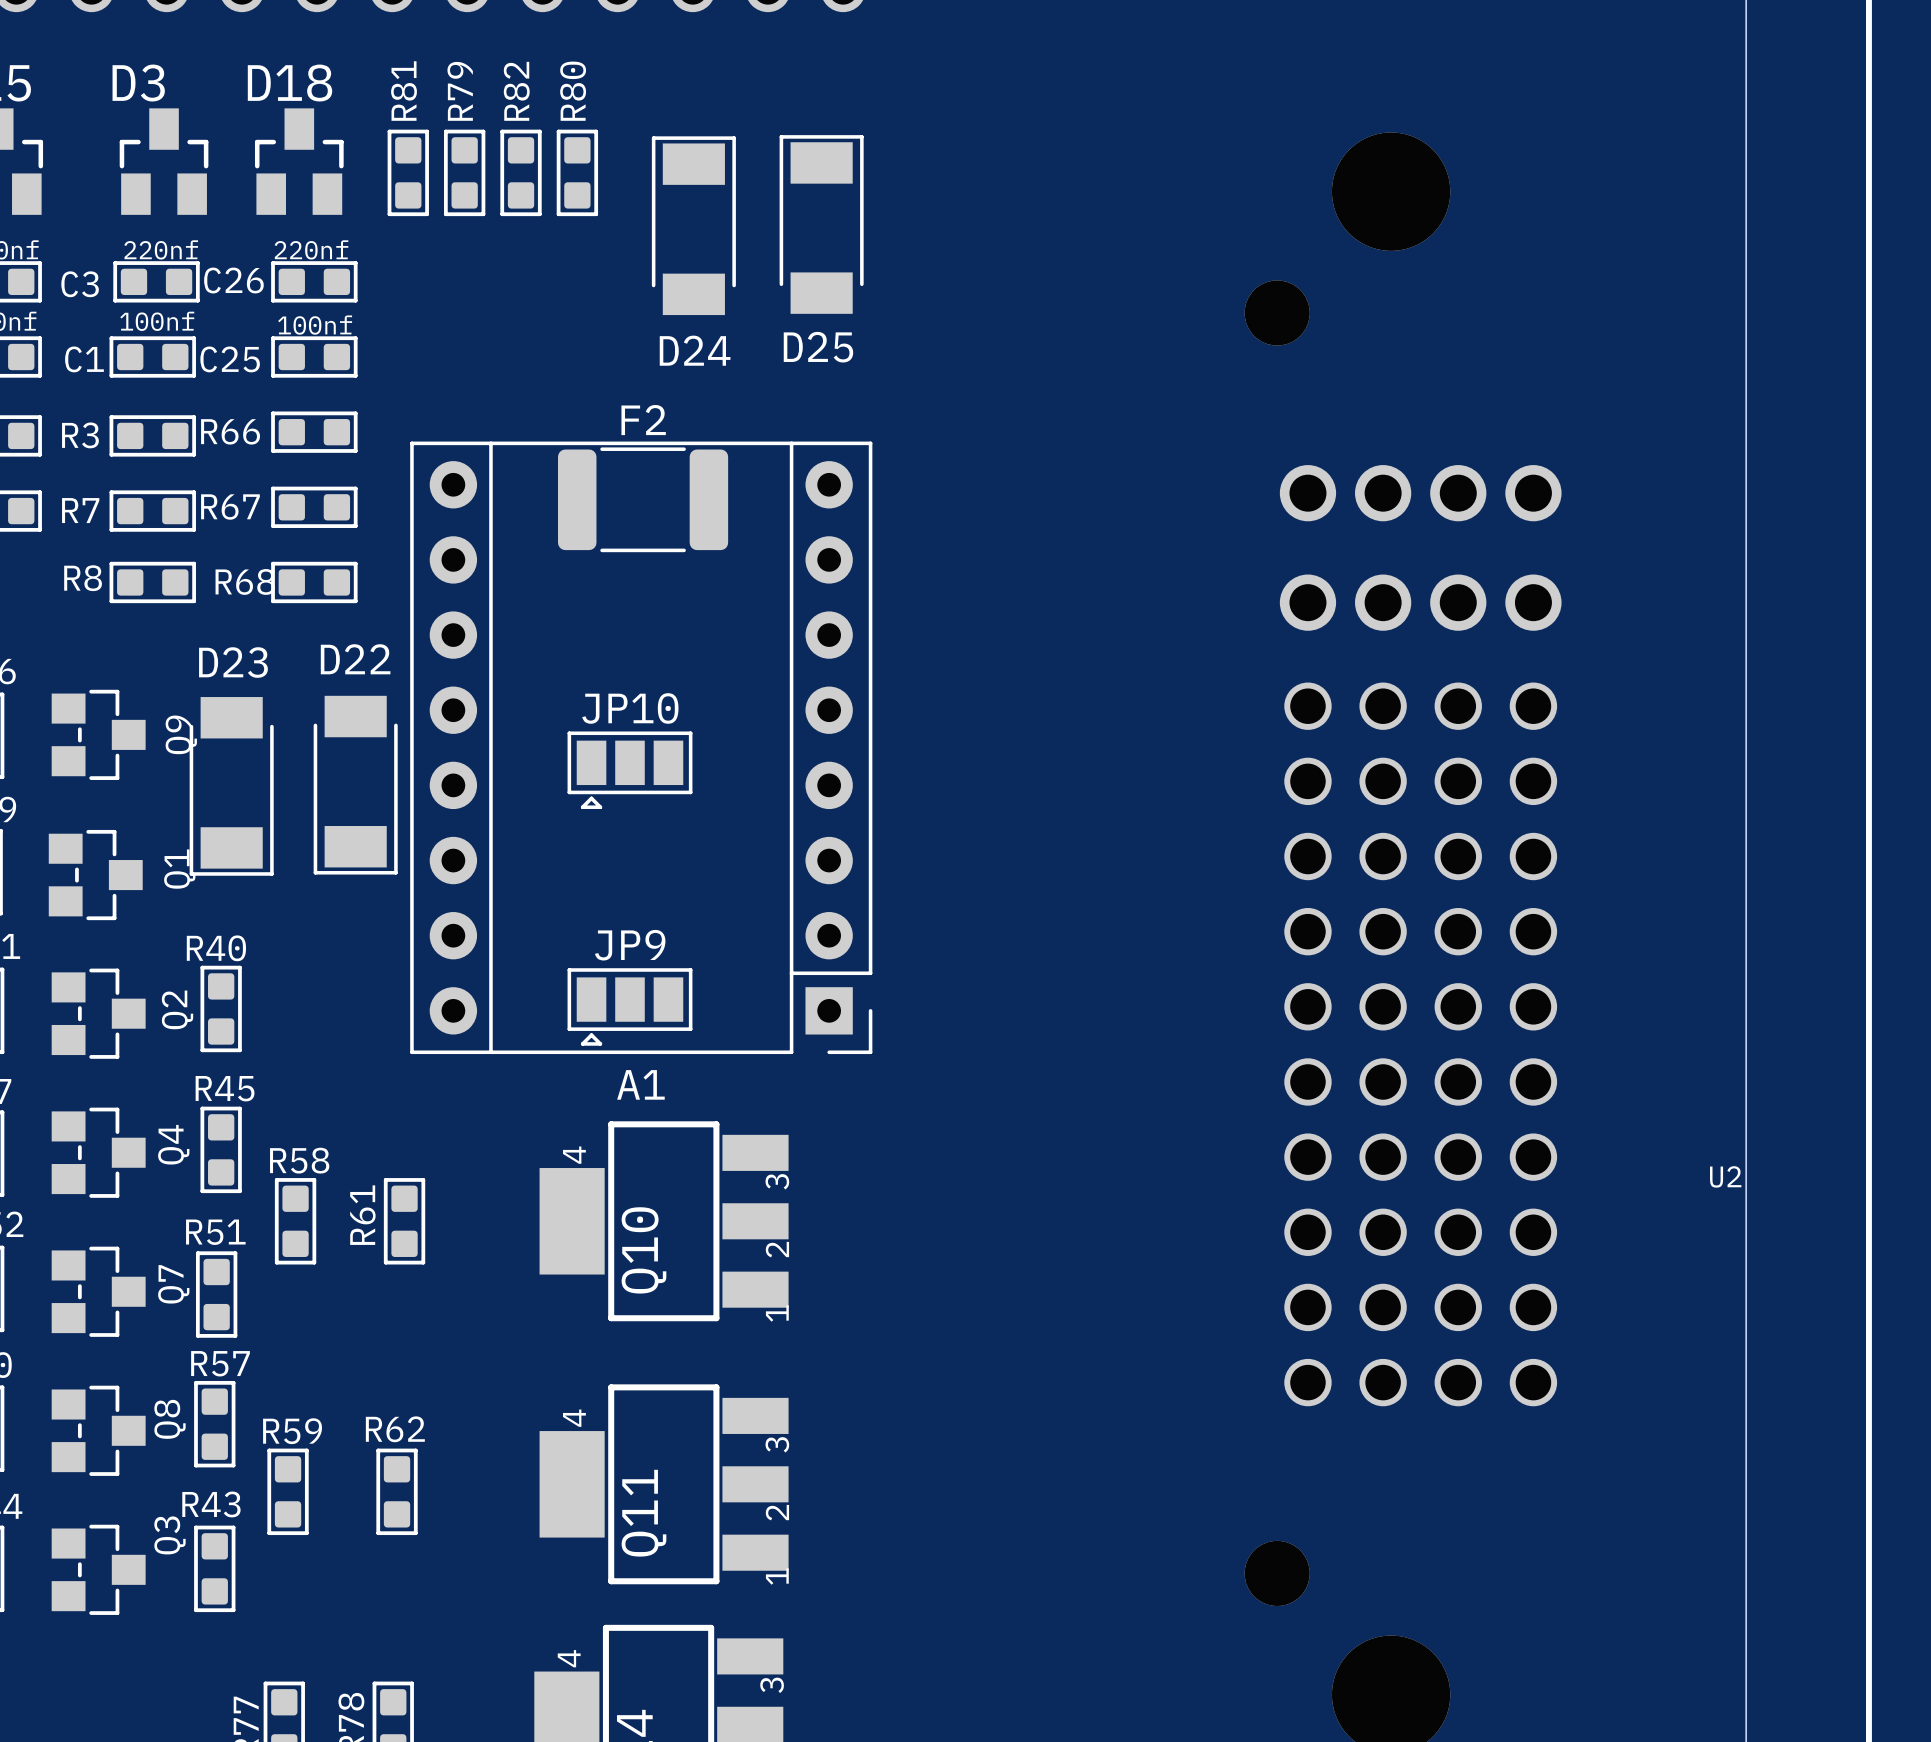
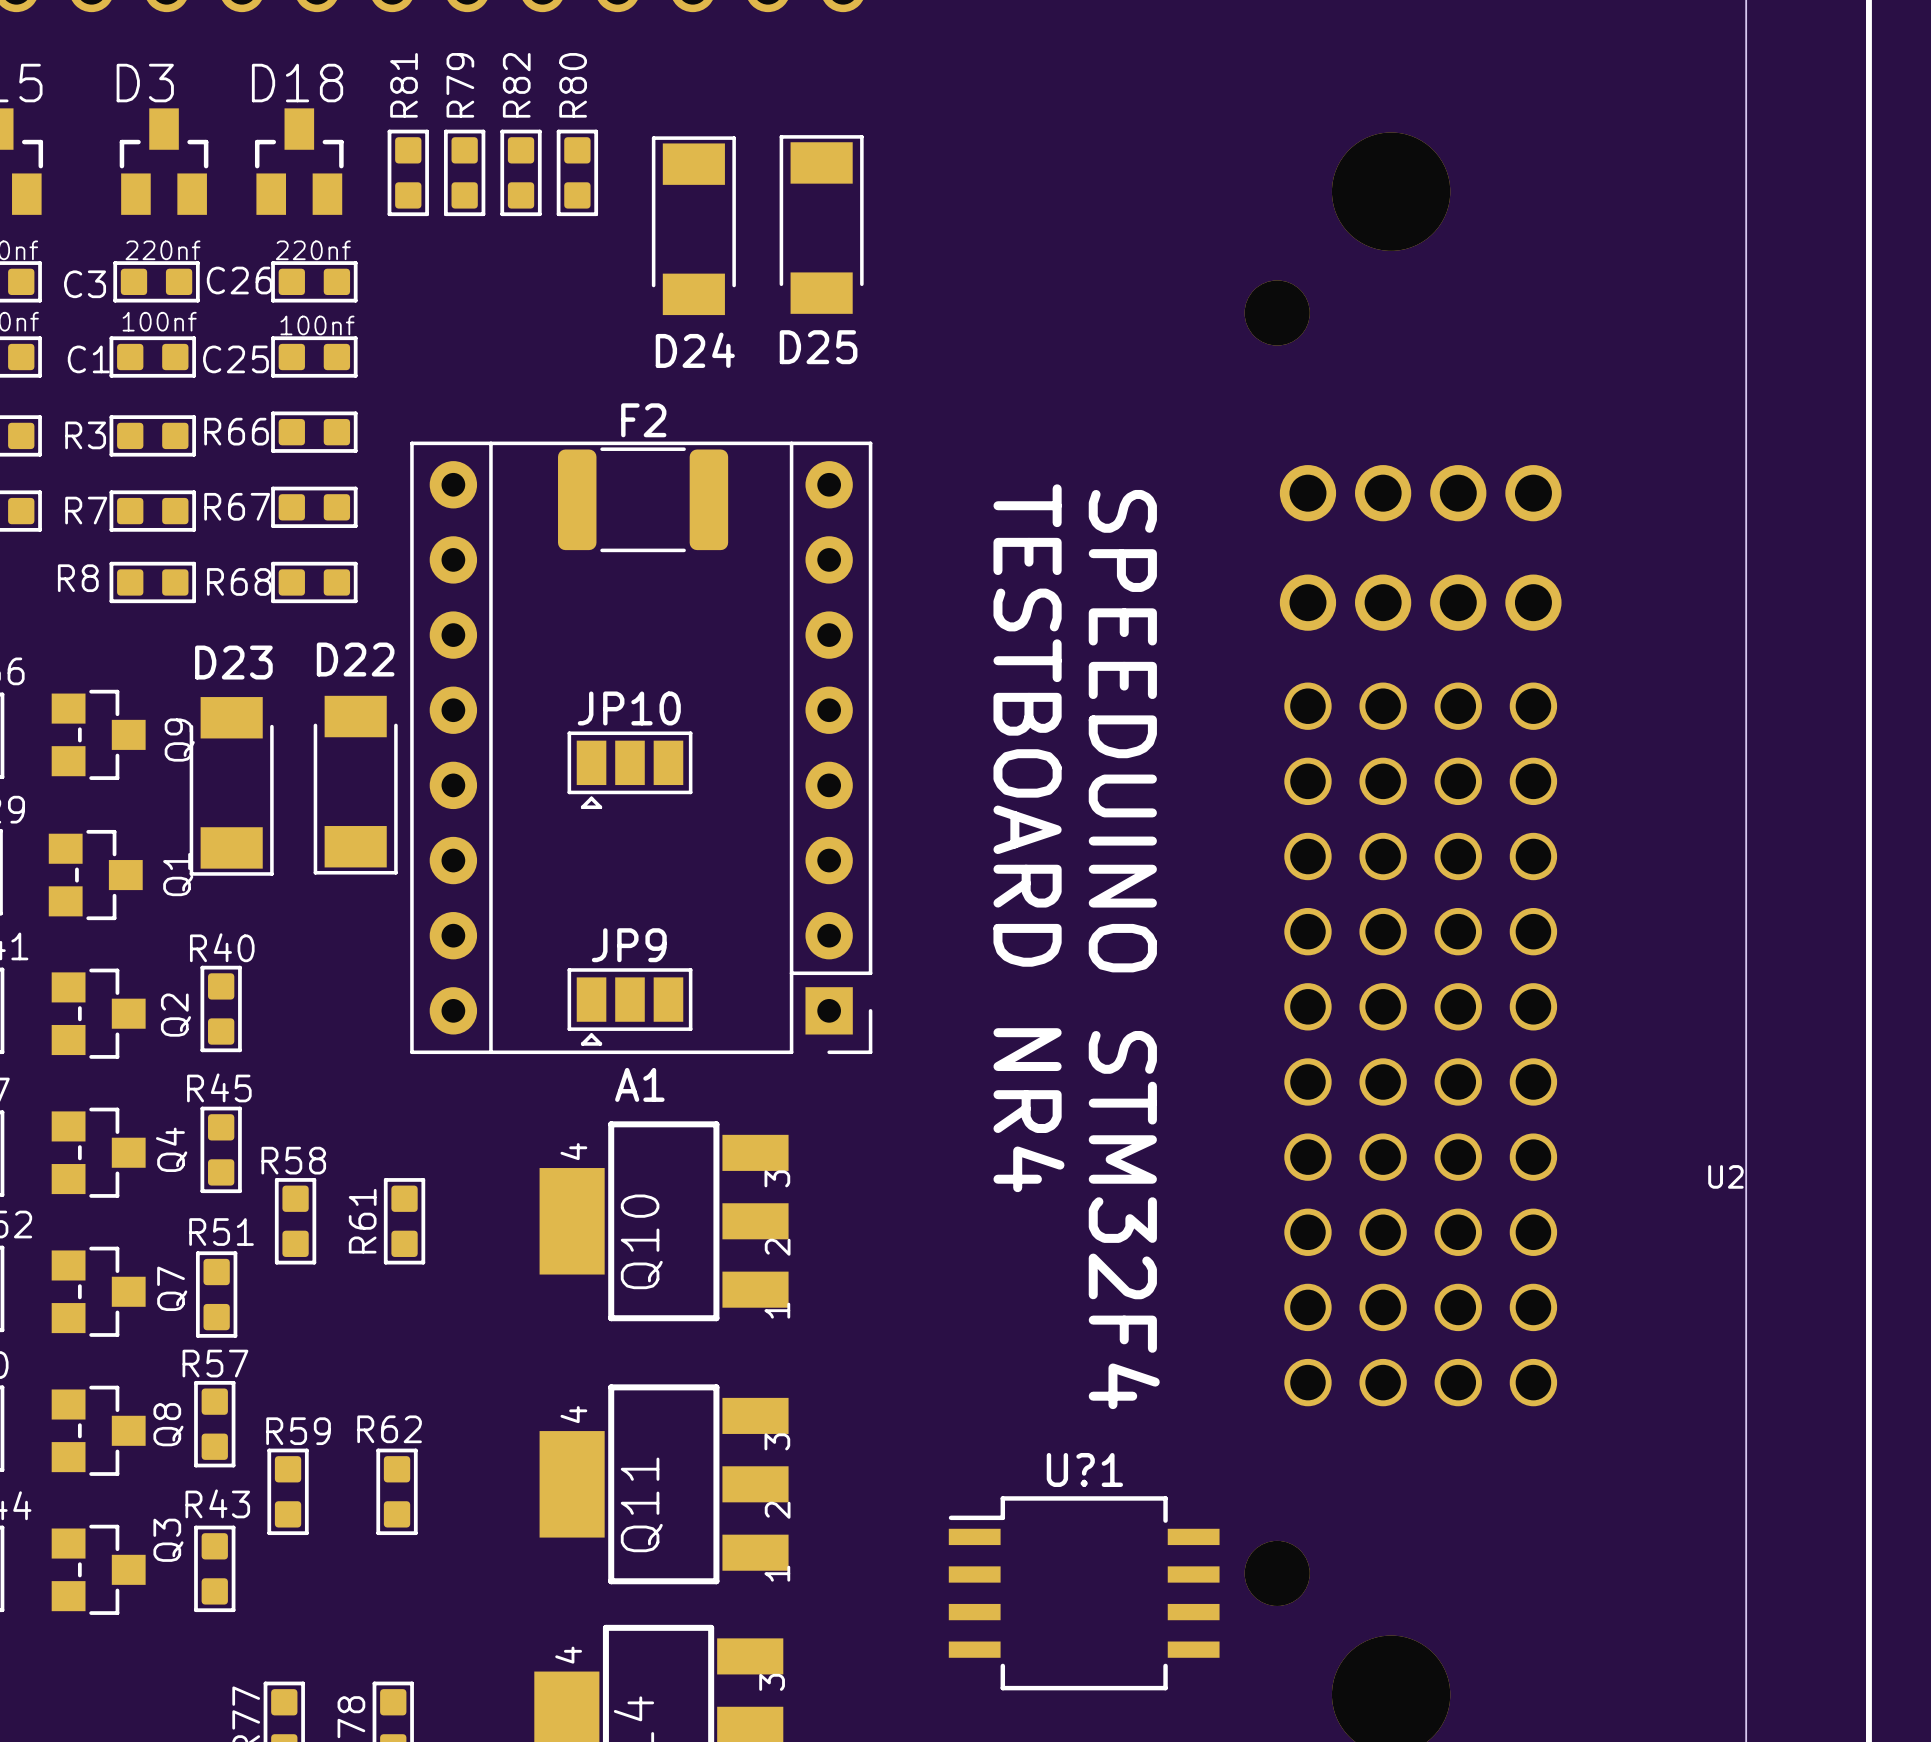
text: none -> TESTBOARD NR4 (1028, 838)
text: none -> SPEEDUINO STM32F4 (1124, 949)
U?1: none -> (1084, 1593)

